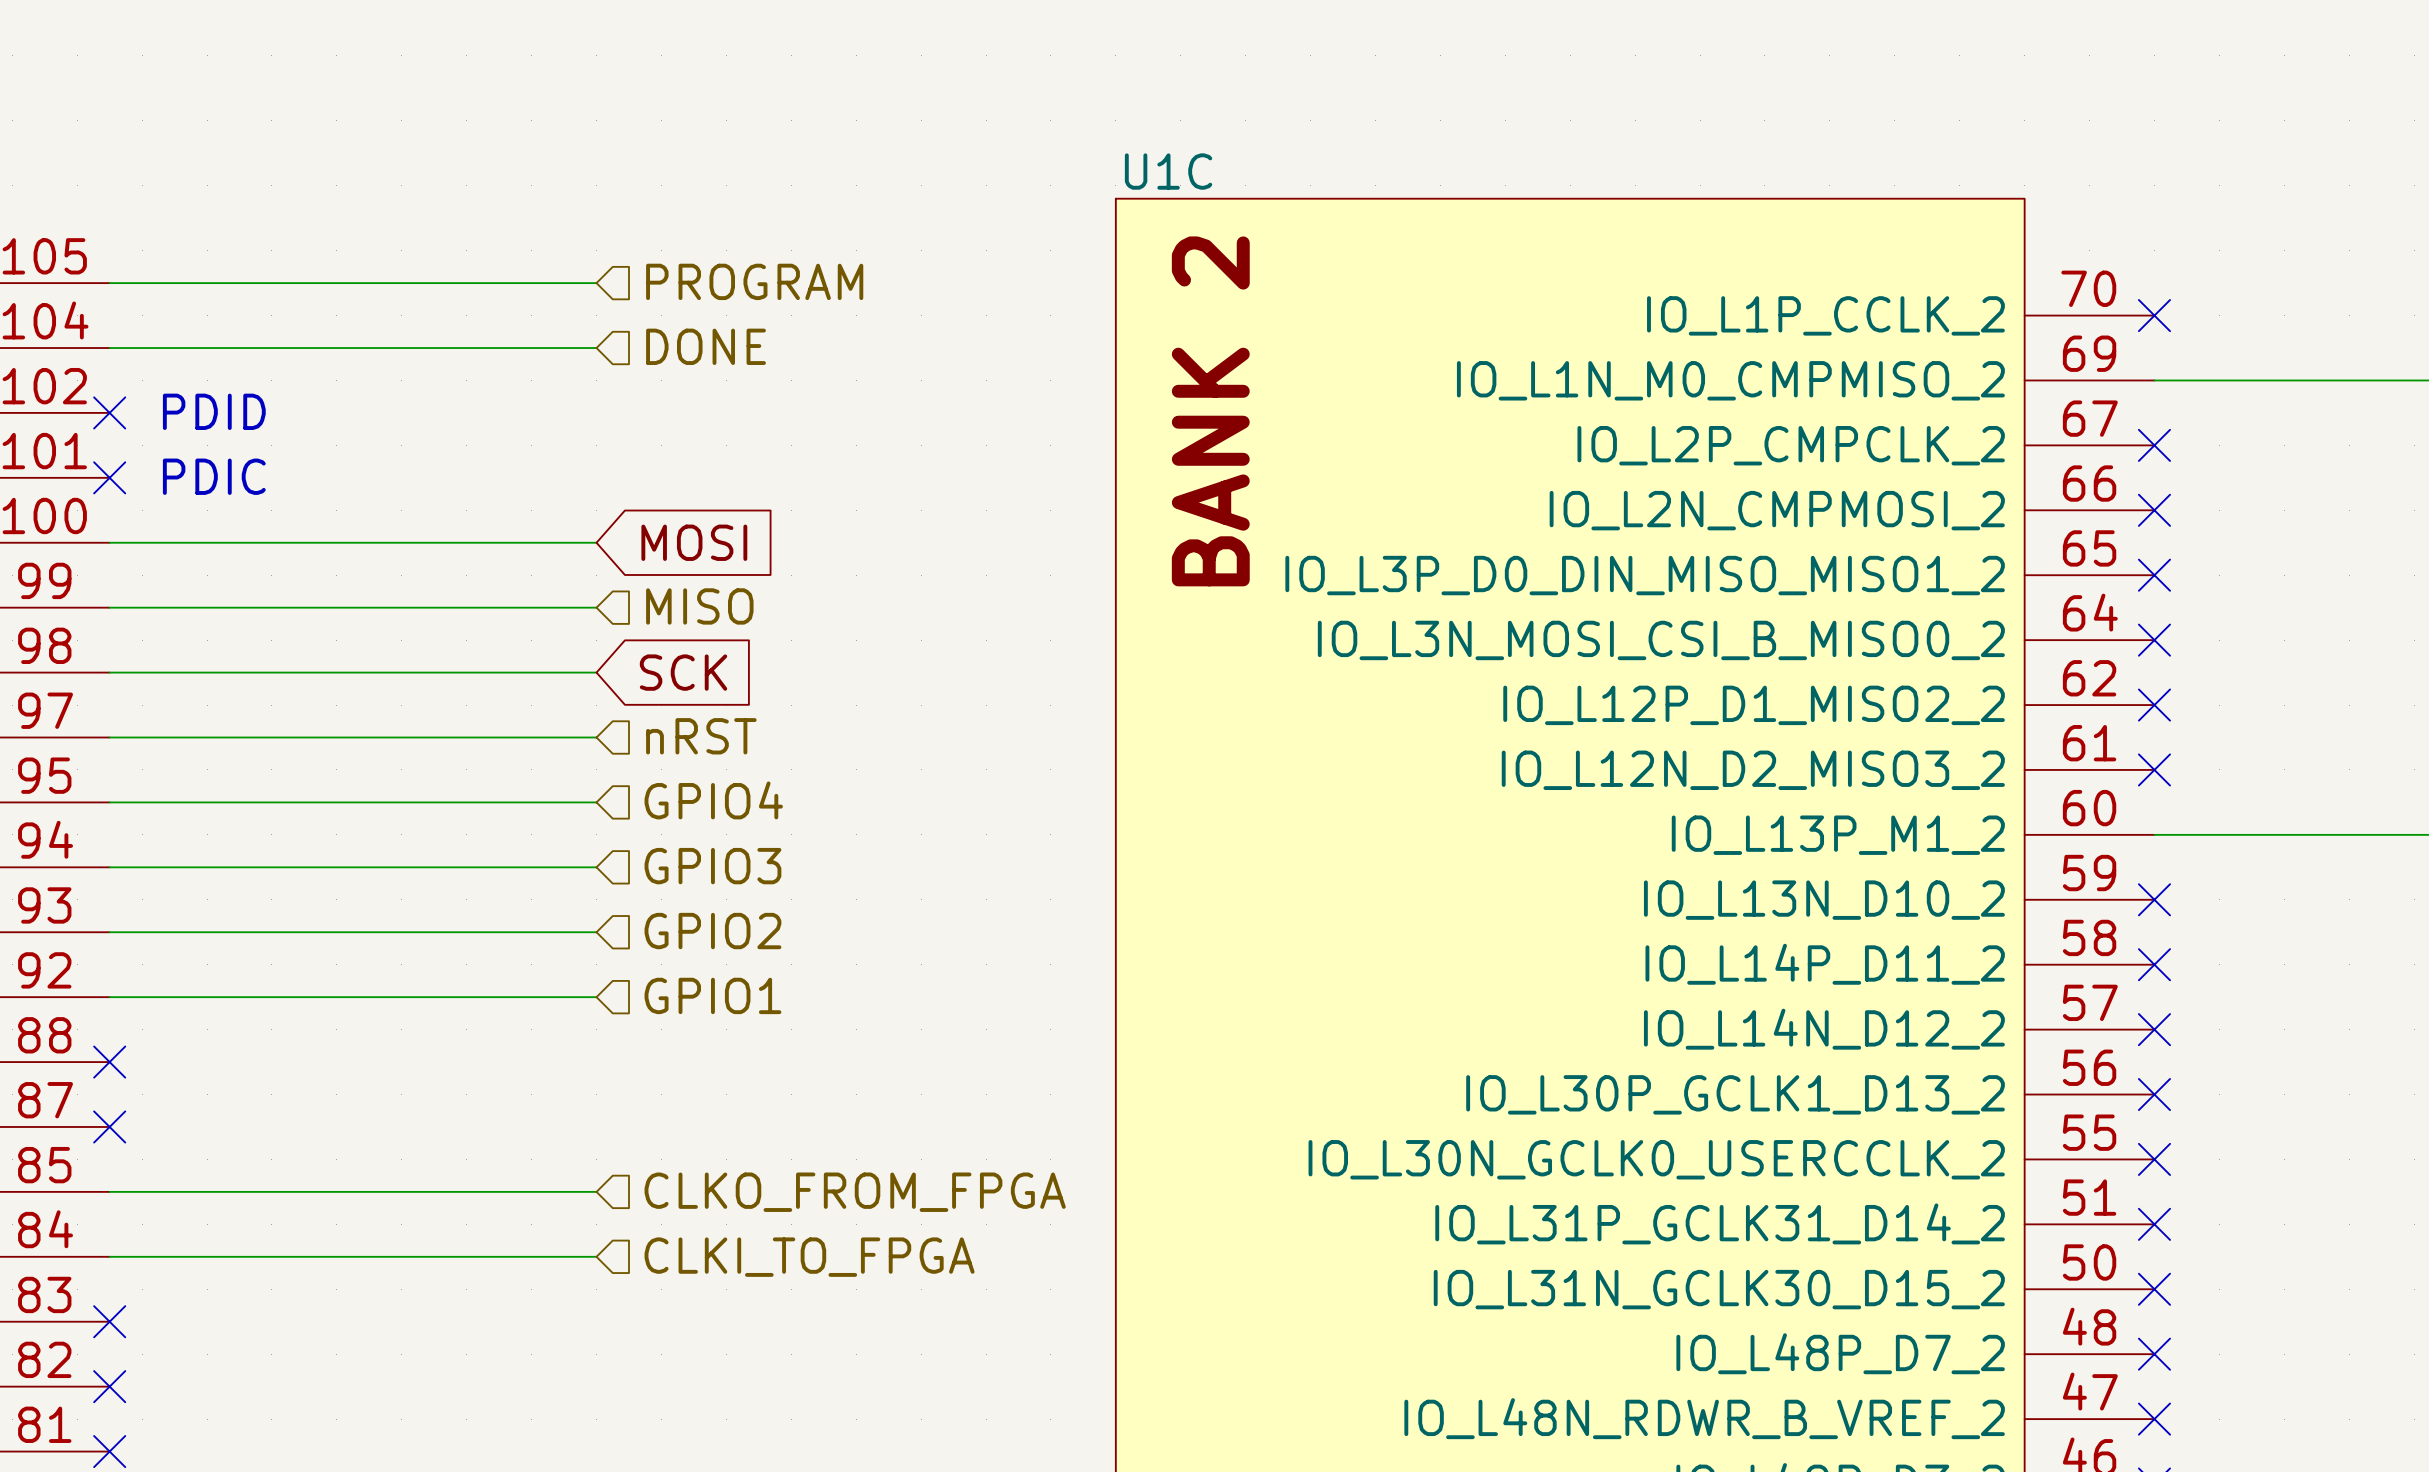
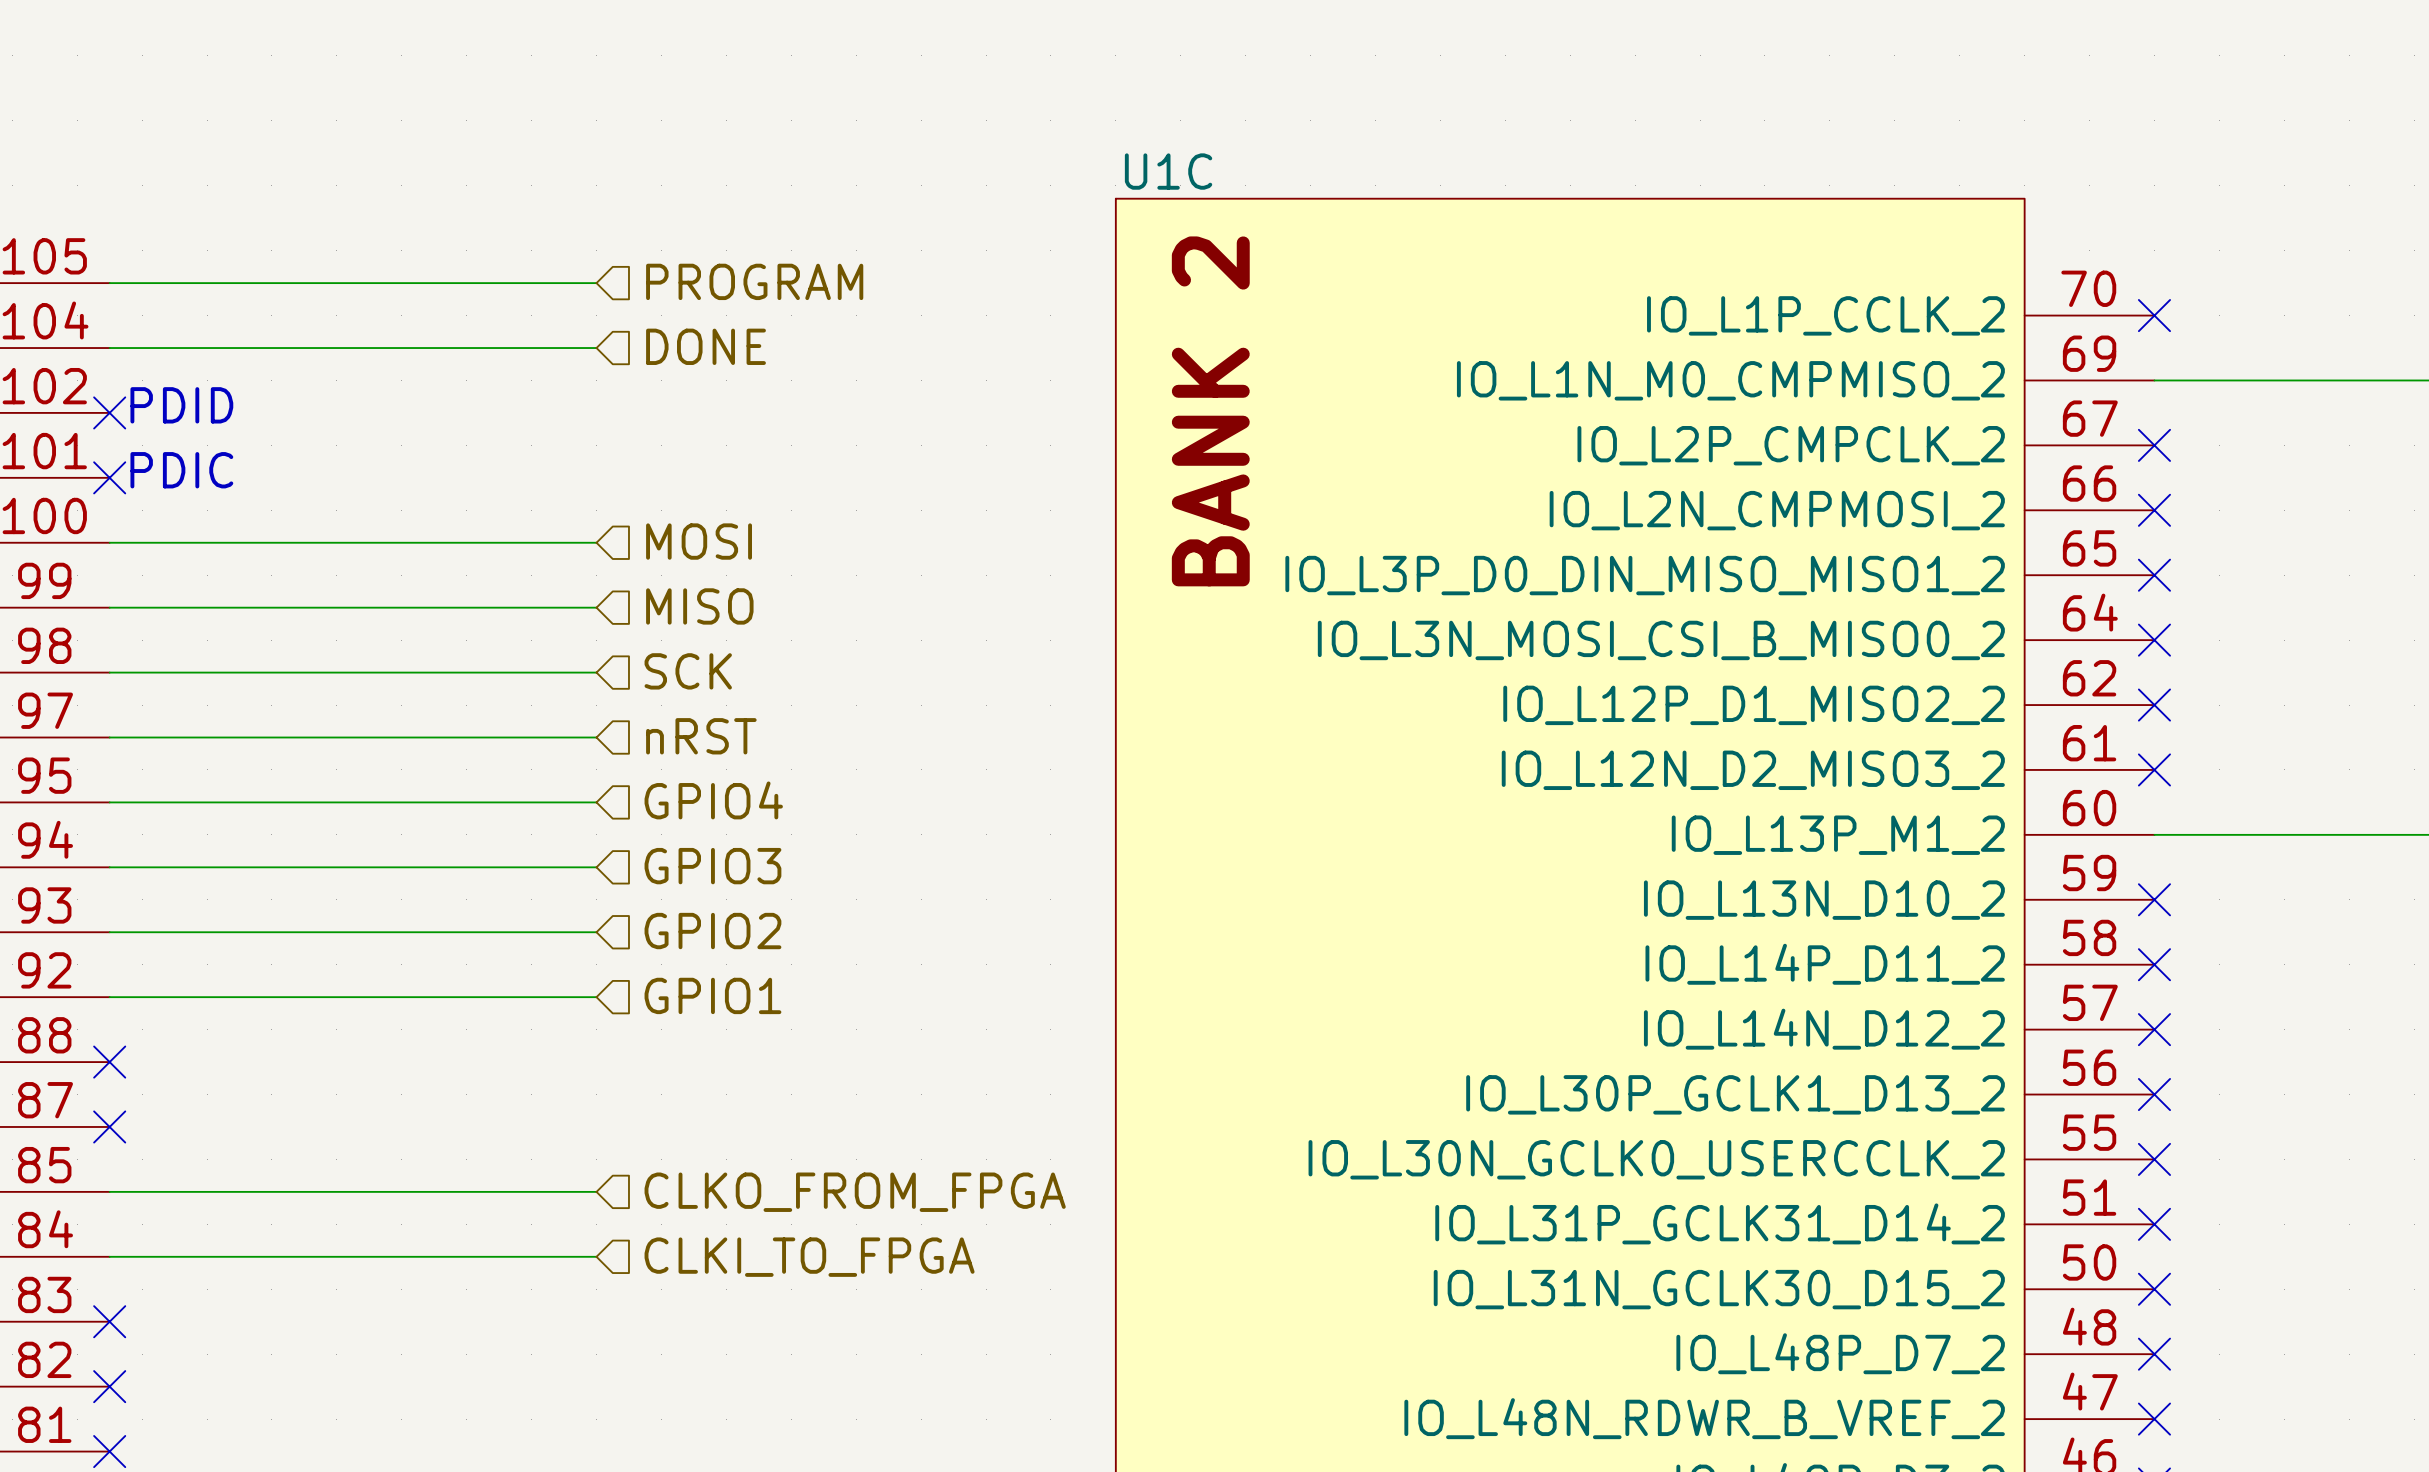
text position: PDID (214, 411) -> PDID (181, 405)
text position: PDIC (214, 476) -> PDIC (181, 470)
hierarchical label: none -> MOSI (699, 541)
global label: MOSI (694, 542) -> none
hierarchical label: none -> SCK (688, 671)
global label: SCK (683, 672) -> none

